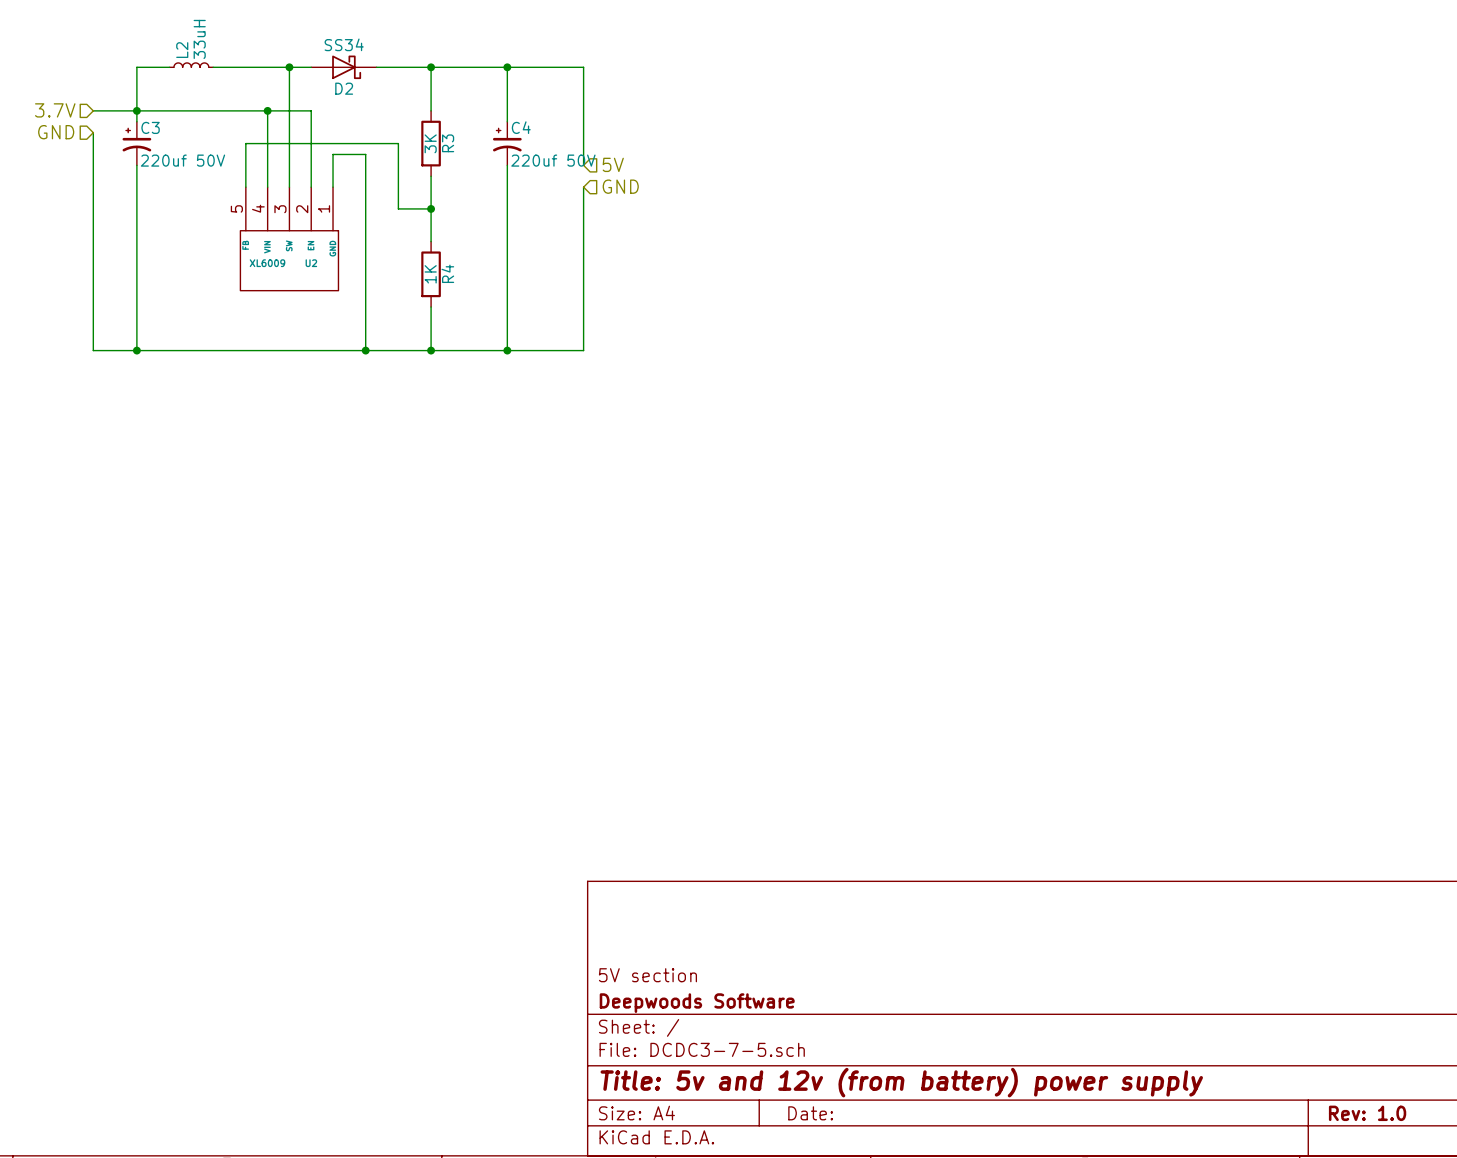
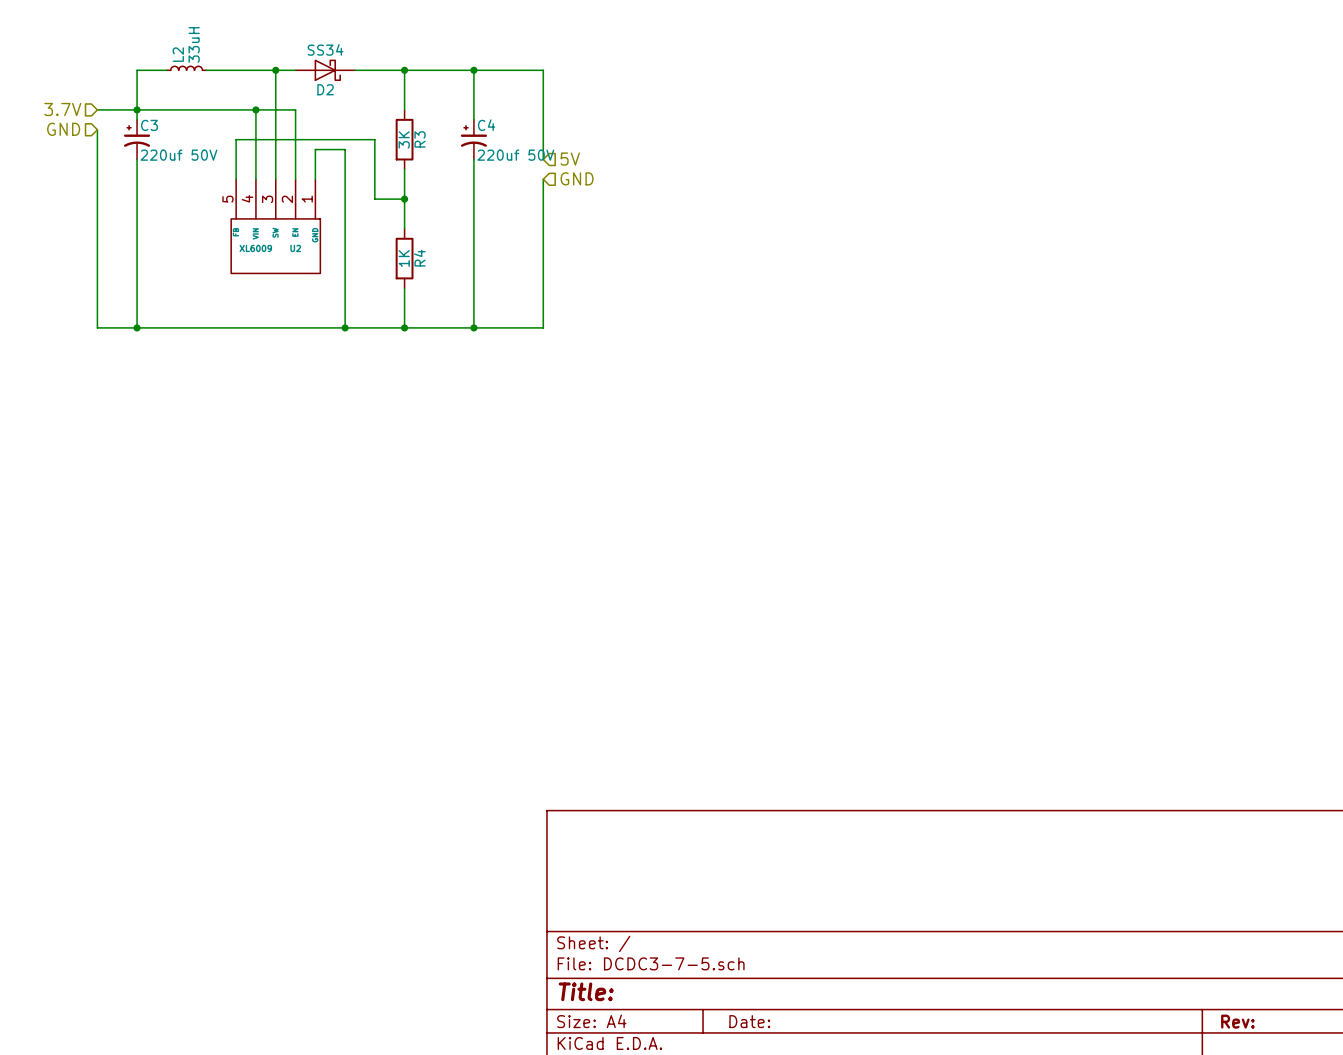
title block: 5V section (647, 975) -> none
title block: Deepwoods Software (697, 1003) -> none
title block: Title: 5v and 12v (from battery) power supply (901, 1082) -> Title: (586, 991)
title block: Rev: 1.0 (1367, 1113) -> Rev: (1237, 1021)

